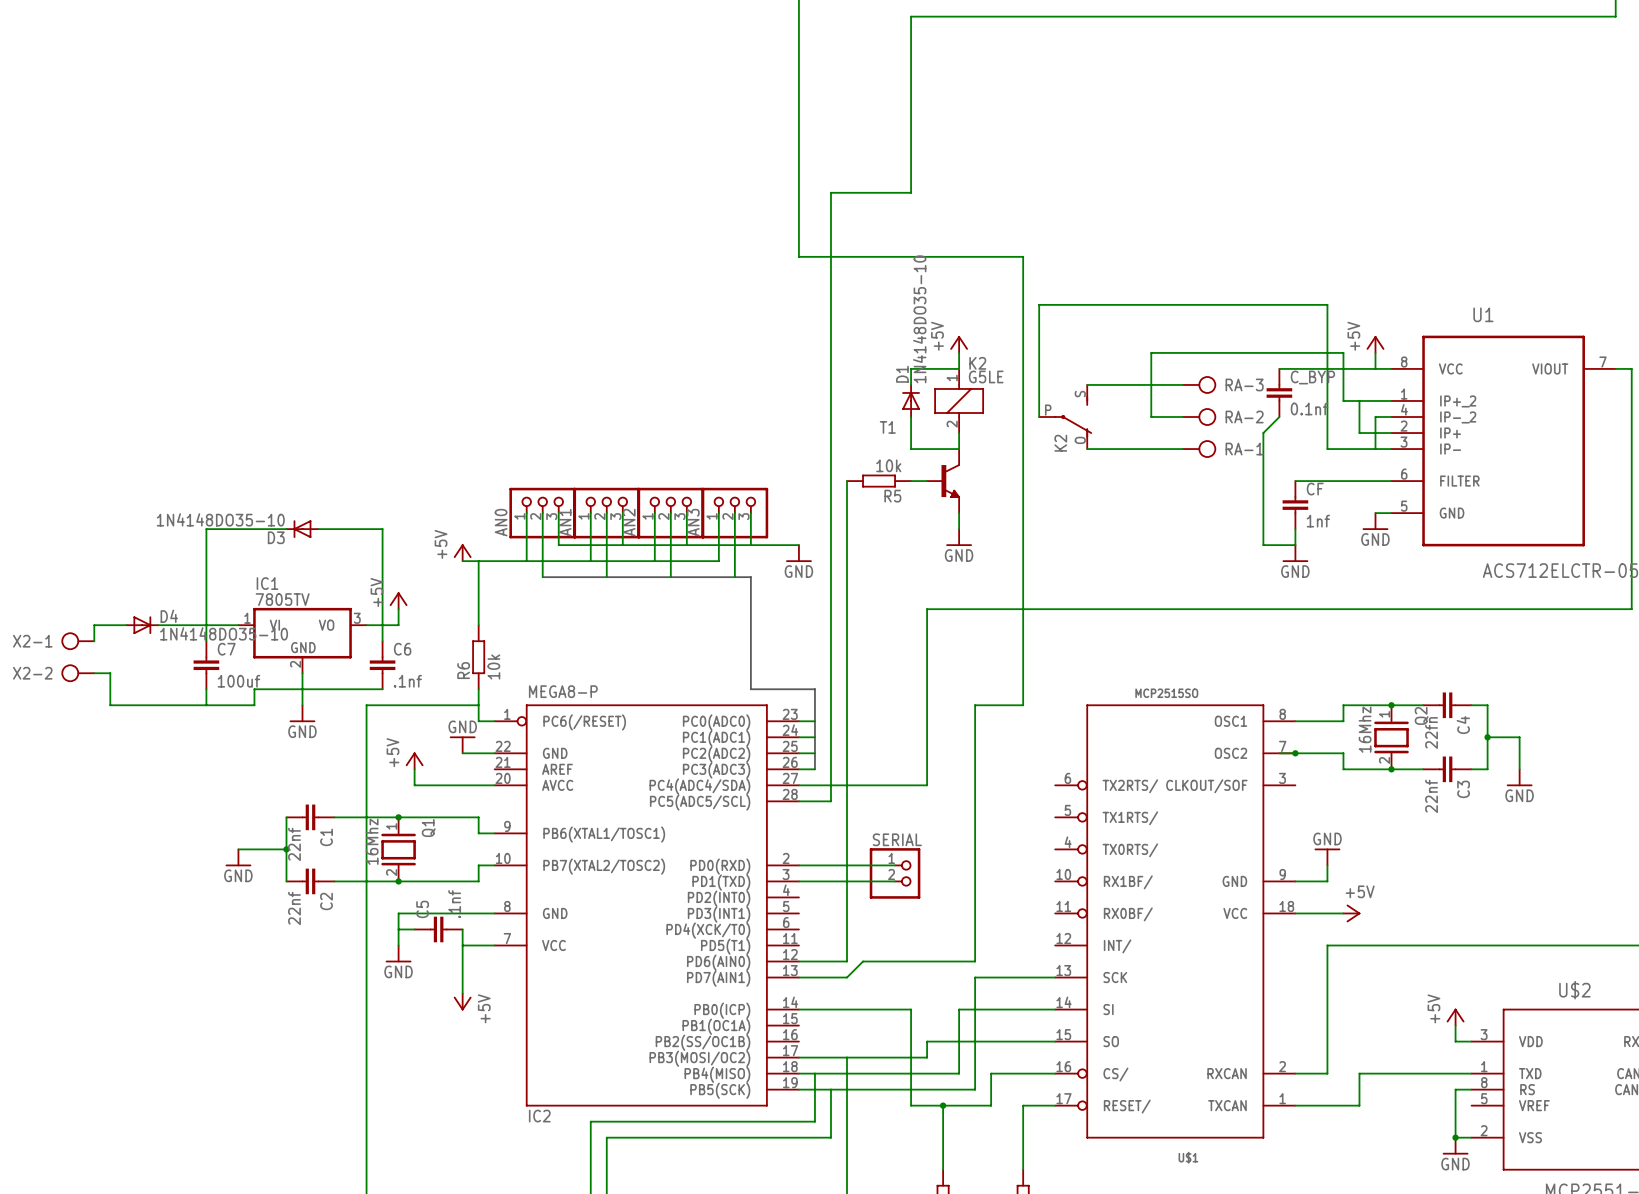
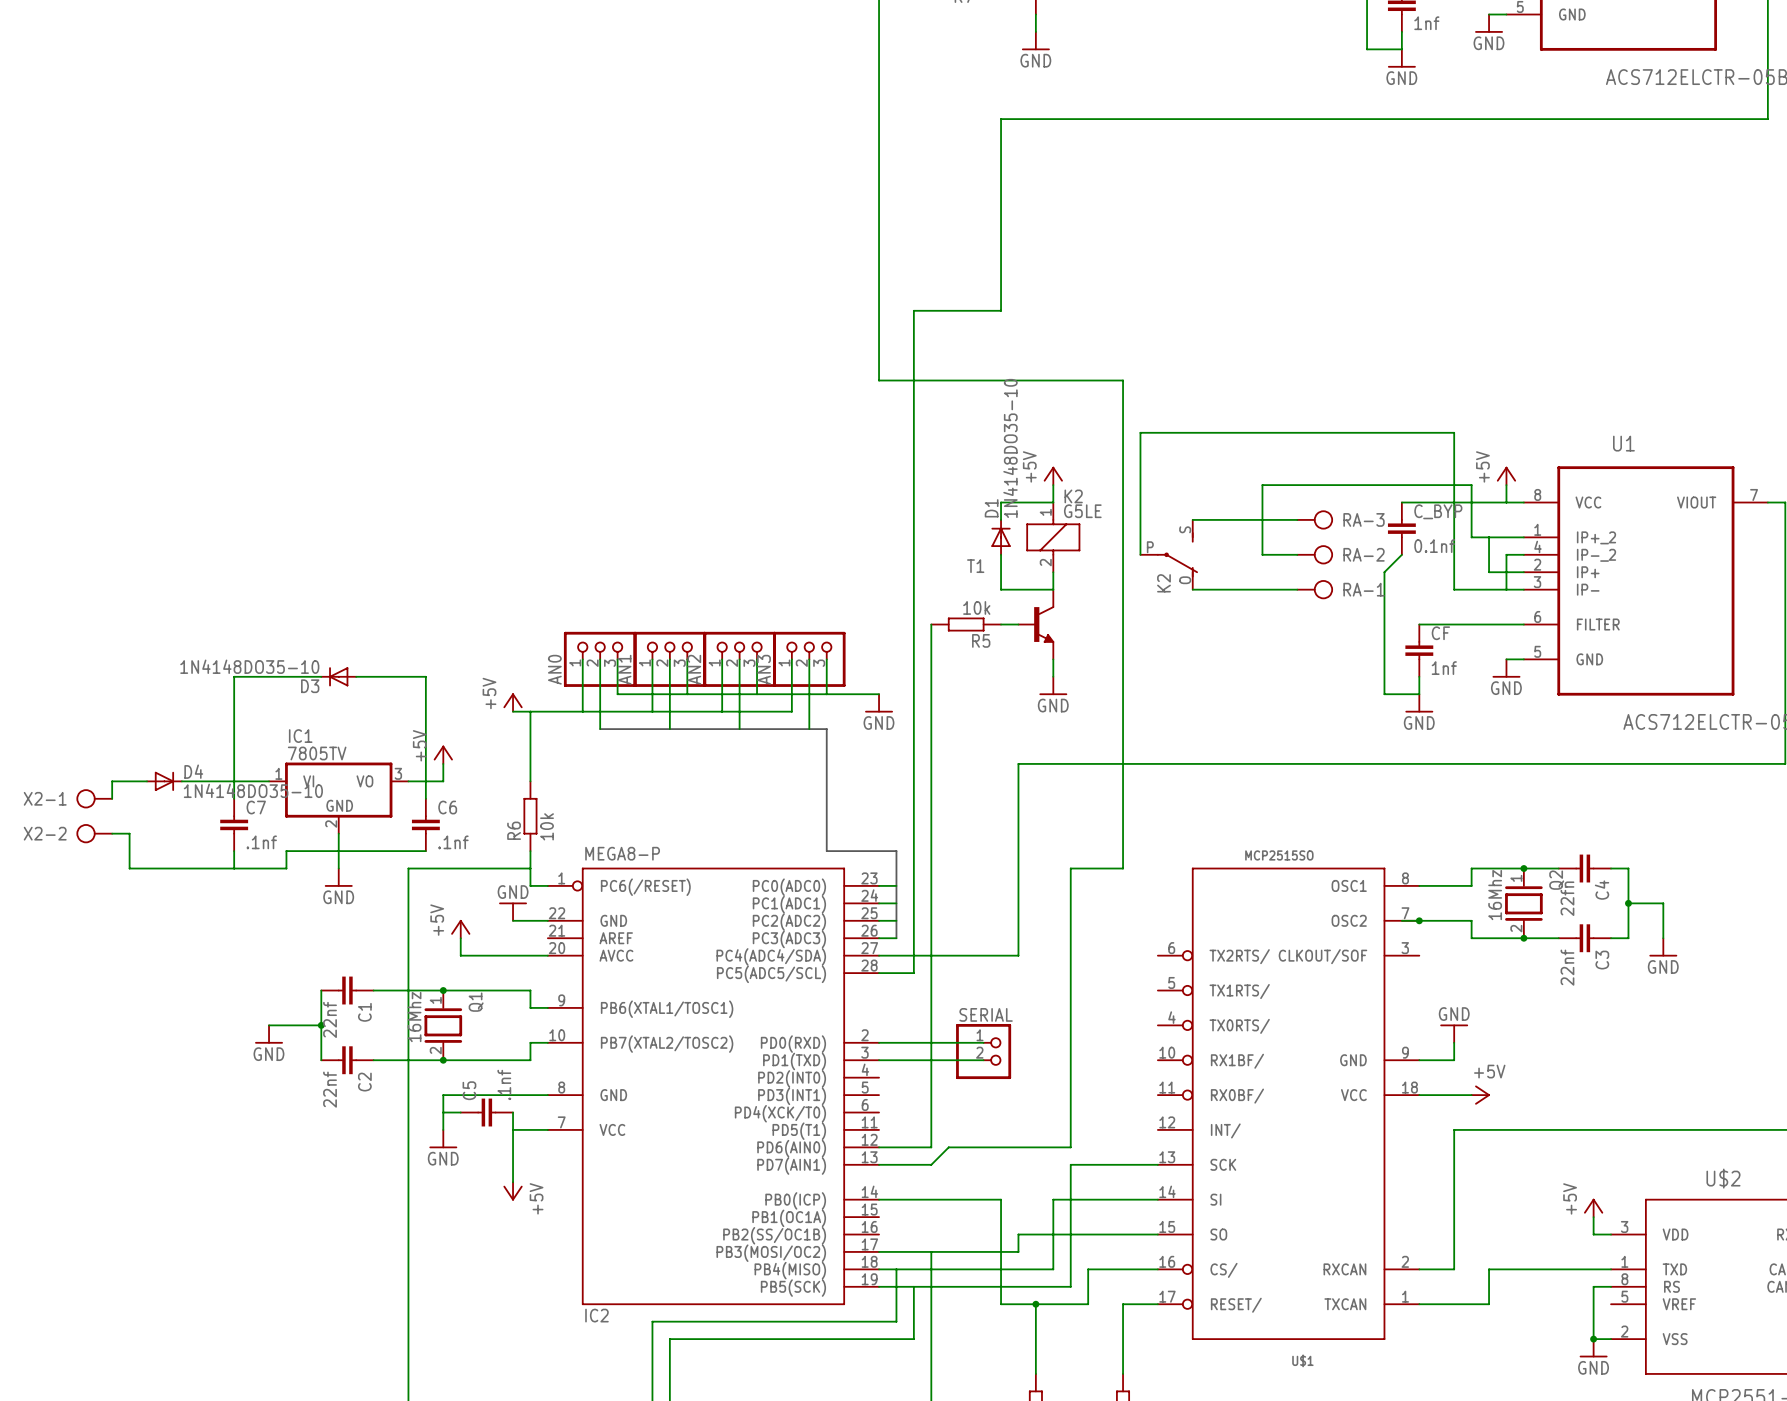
C7 value: 100uf (238, 681) -> .1nf (261, 842)

